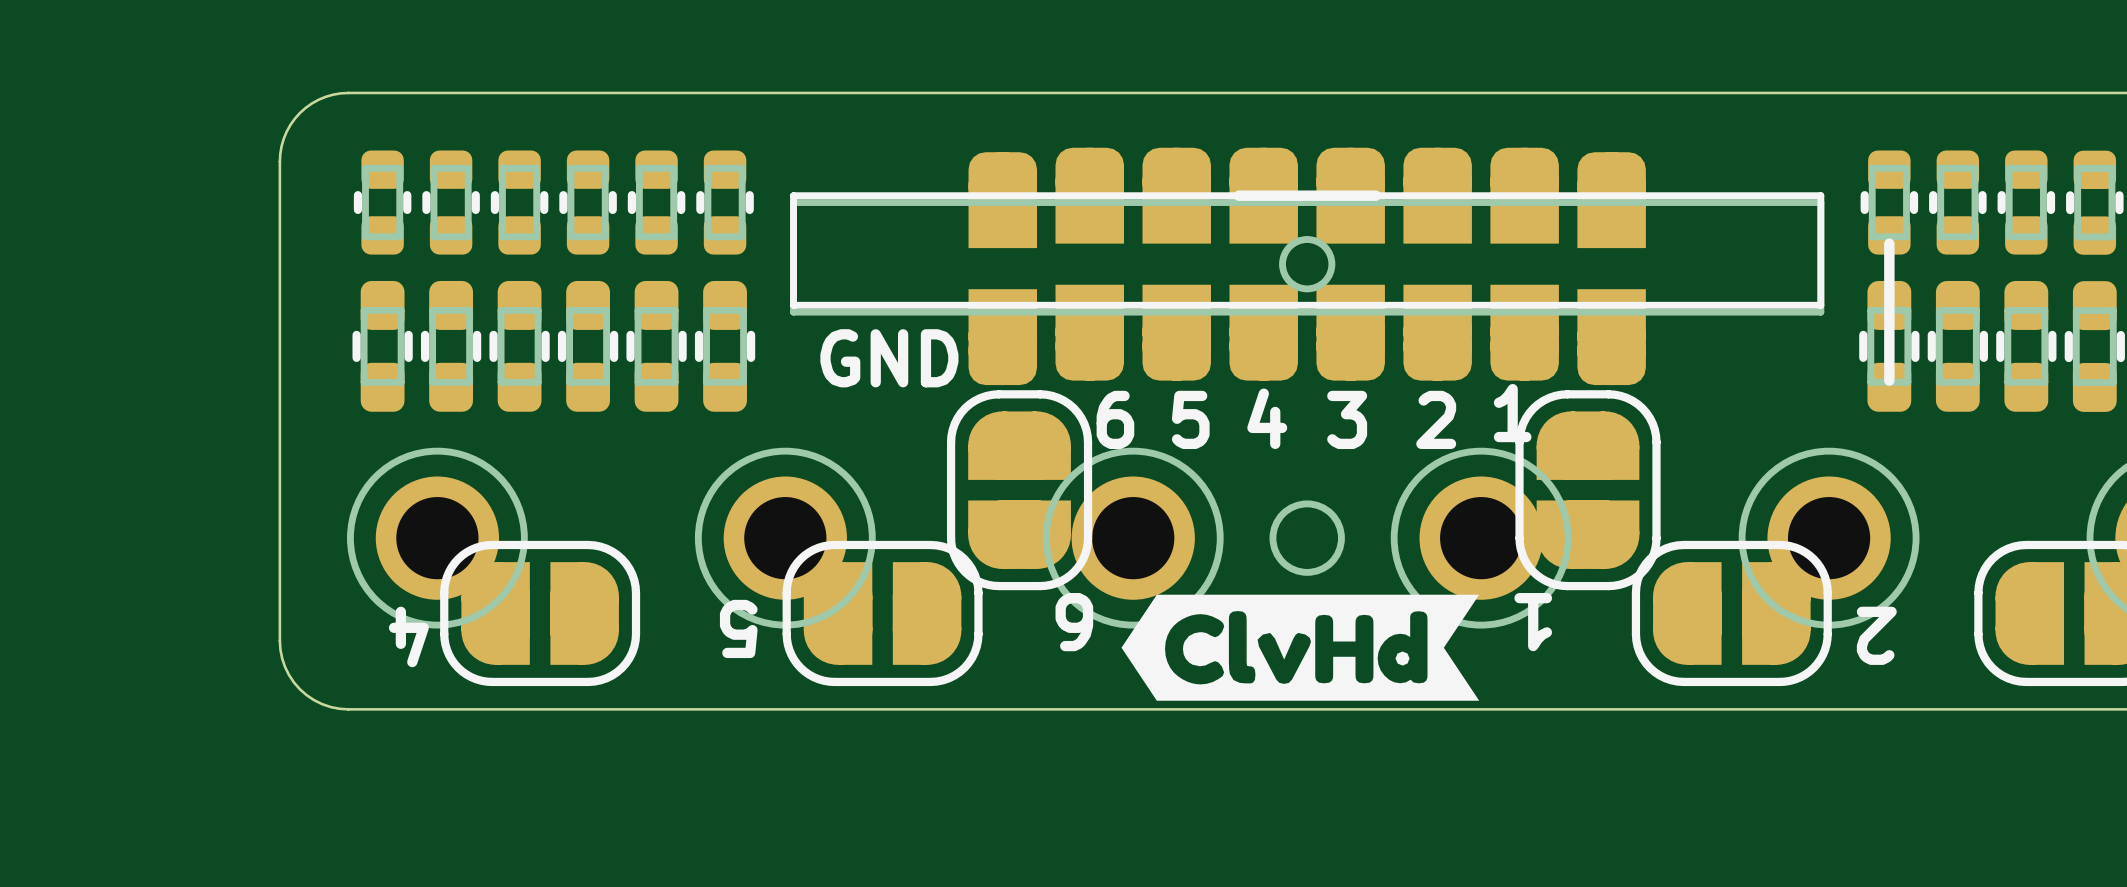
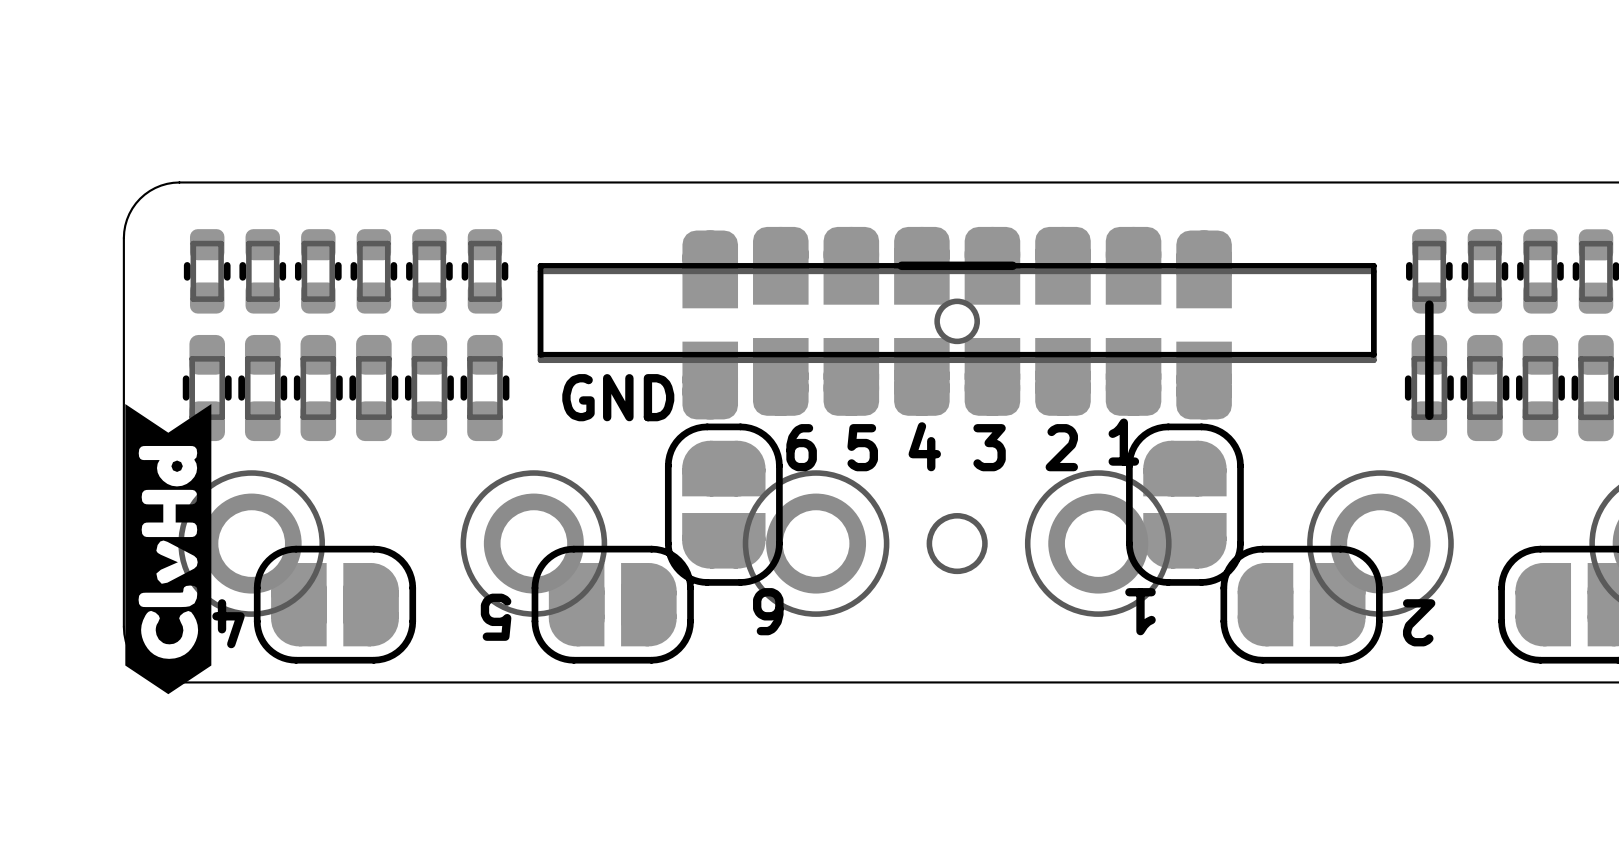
drawing: none -> [125, 404, 212, 695]
drawing: [1121, 594, 1480, 701] -> none

